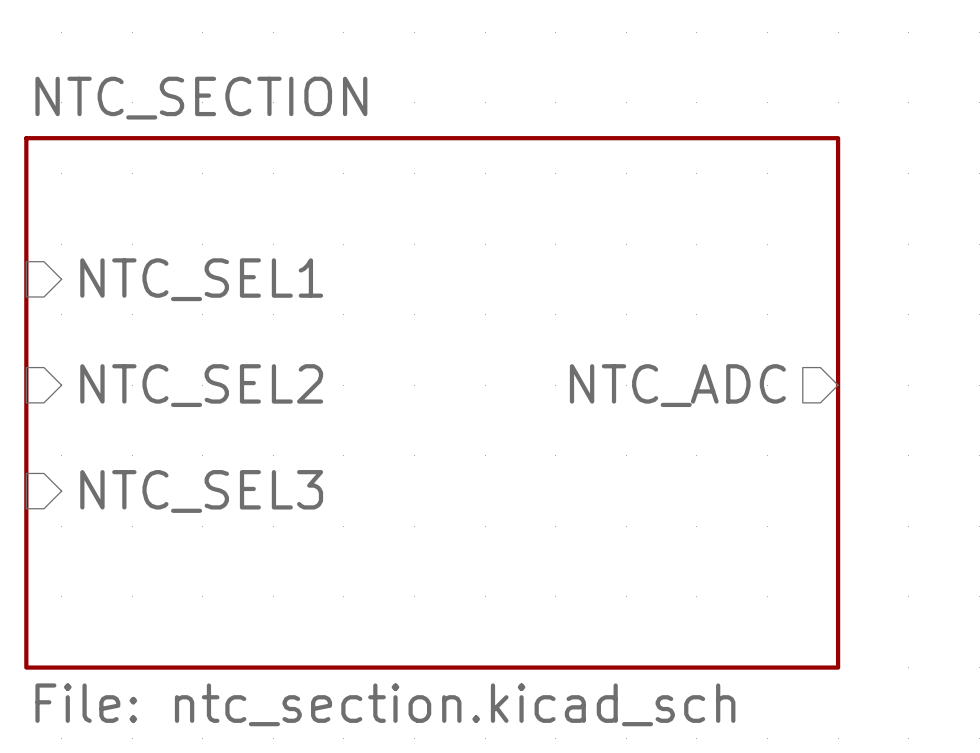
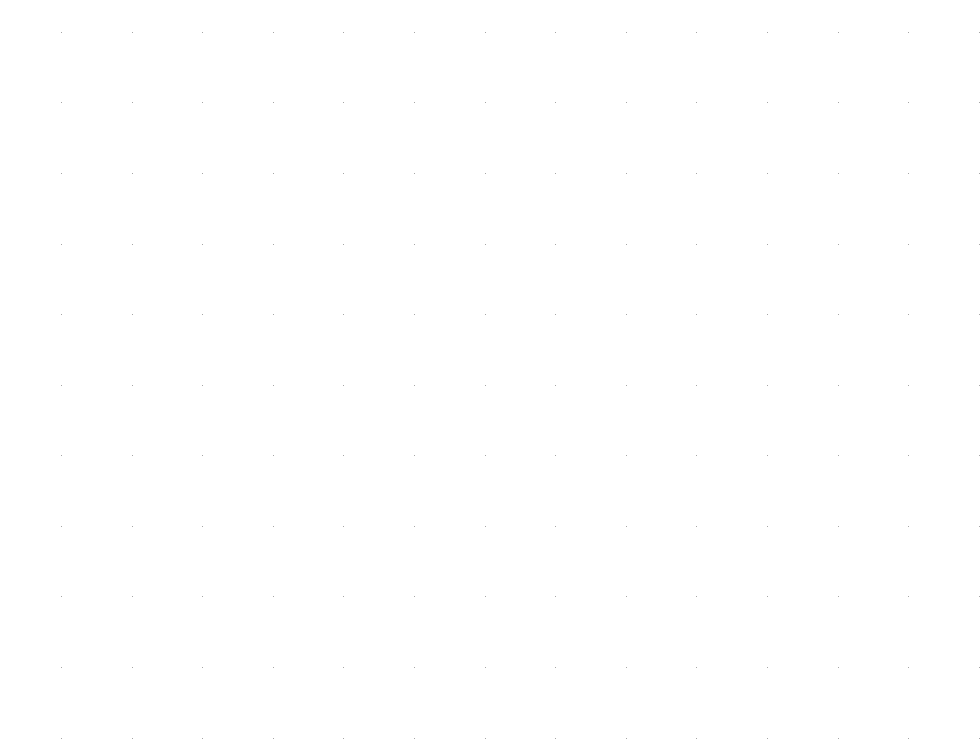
sheet pin: NTC_SEL1 (201, 279) -> none
sheet pin: NTC_SEL2 (201, 385) -> none
sheet pin: NTC_ADC (677, 385) -> none
sheet NTC_SECTION: File: ntc_section.kicad_sch (432, 402) -> none
sheet pin: NTC_SEL3 (201, 491) -> none

